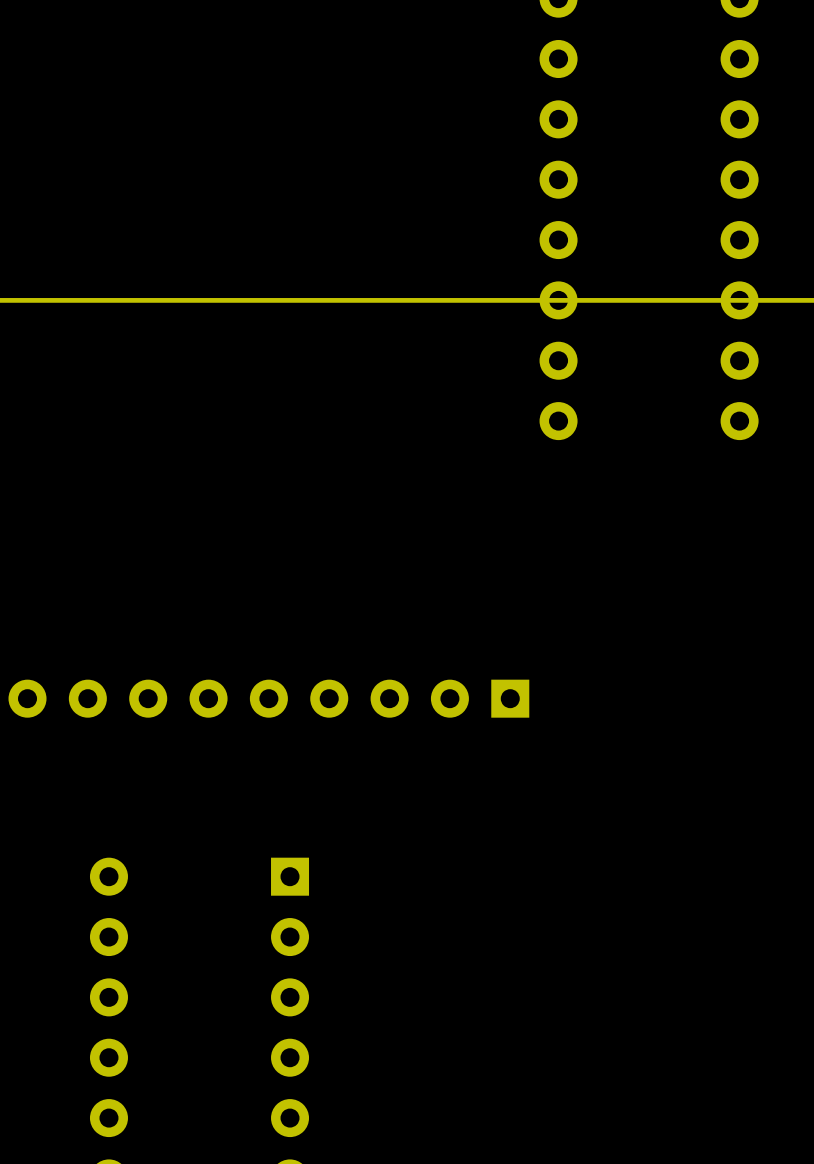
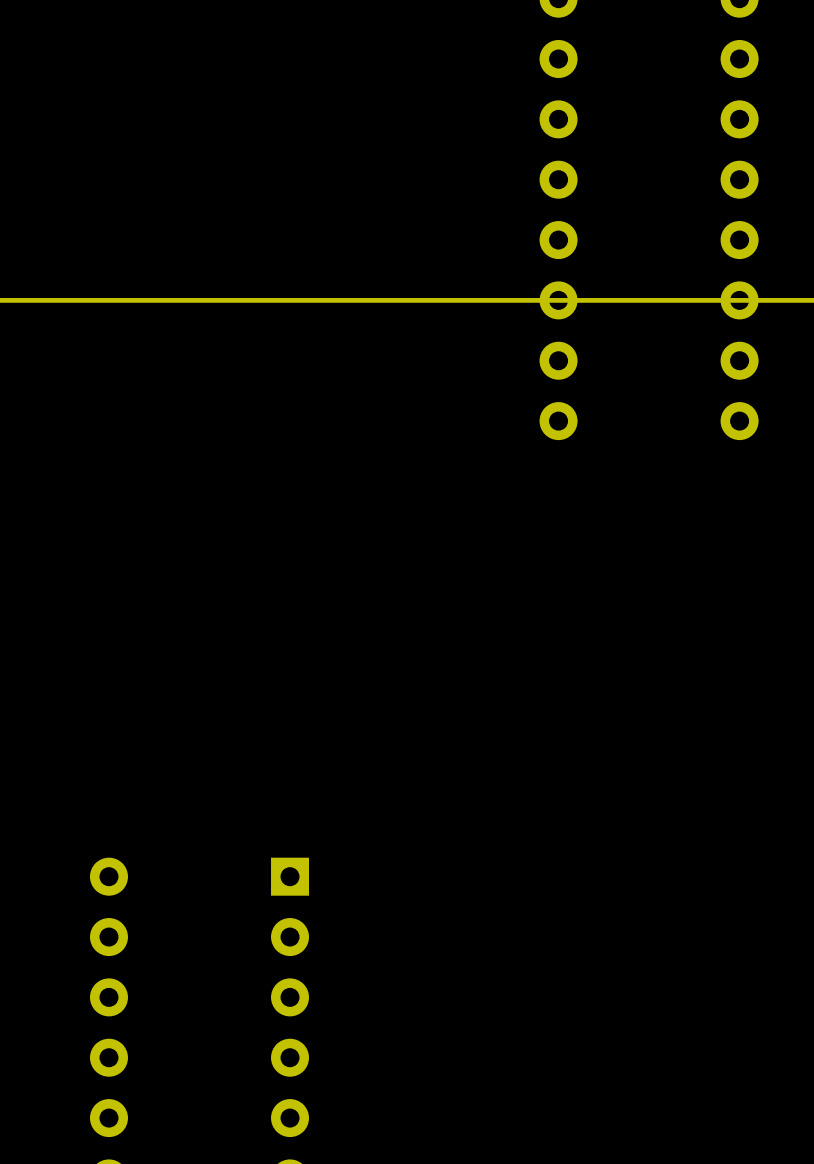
part: (268, 698) -> none

